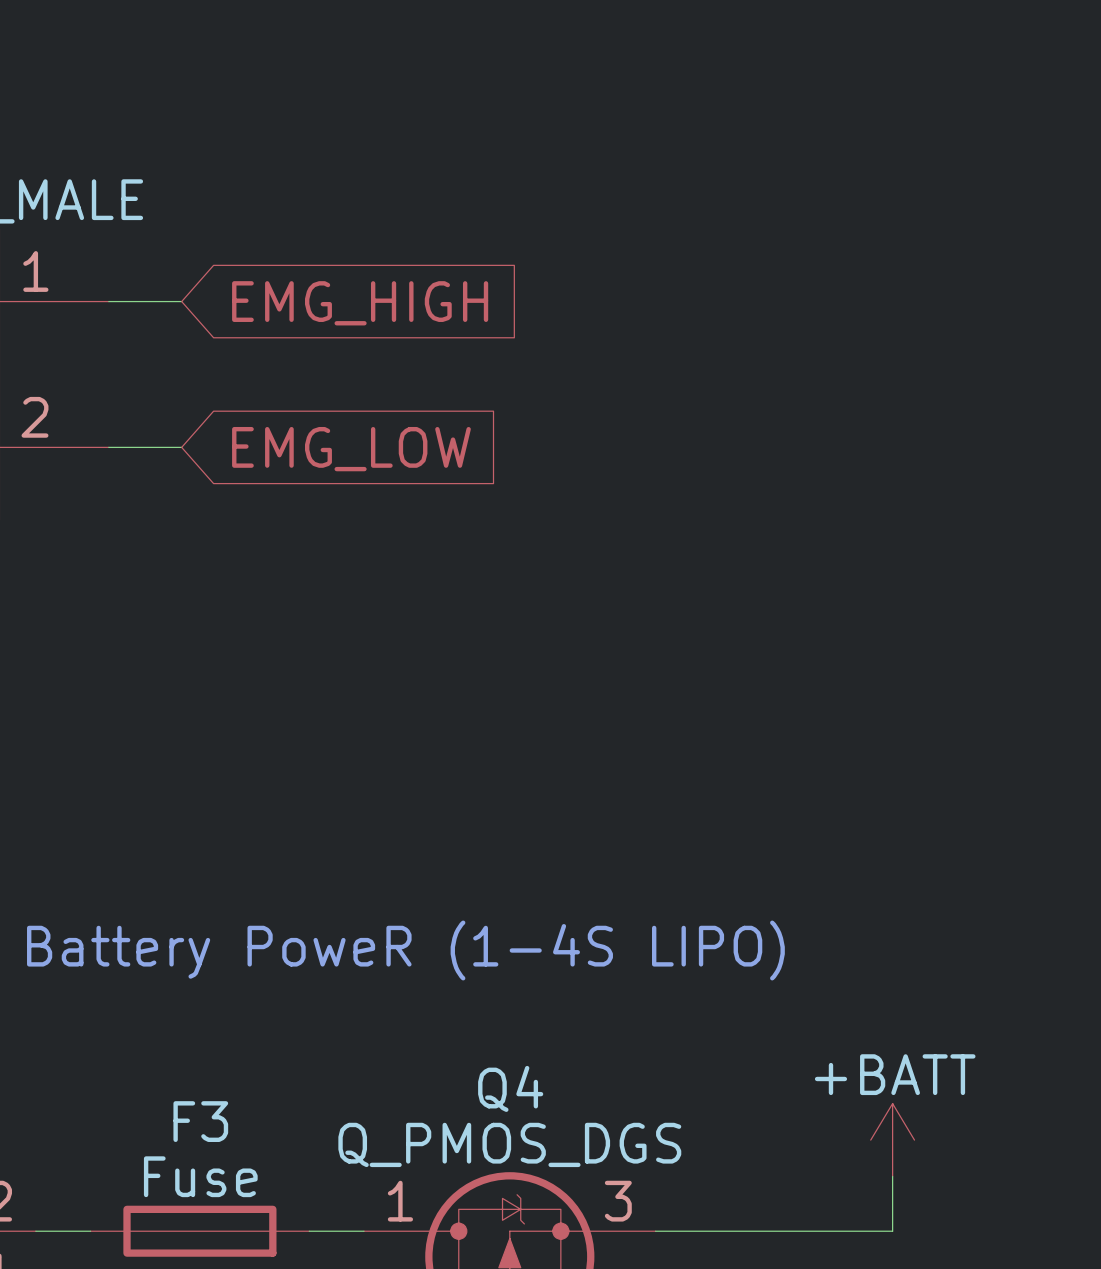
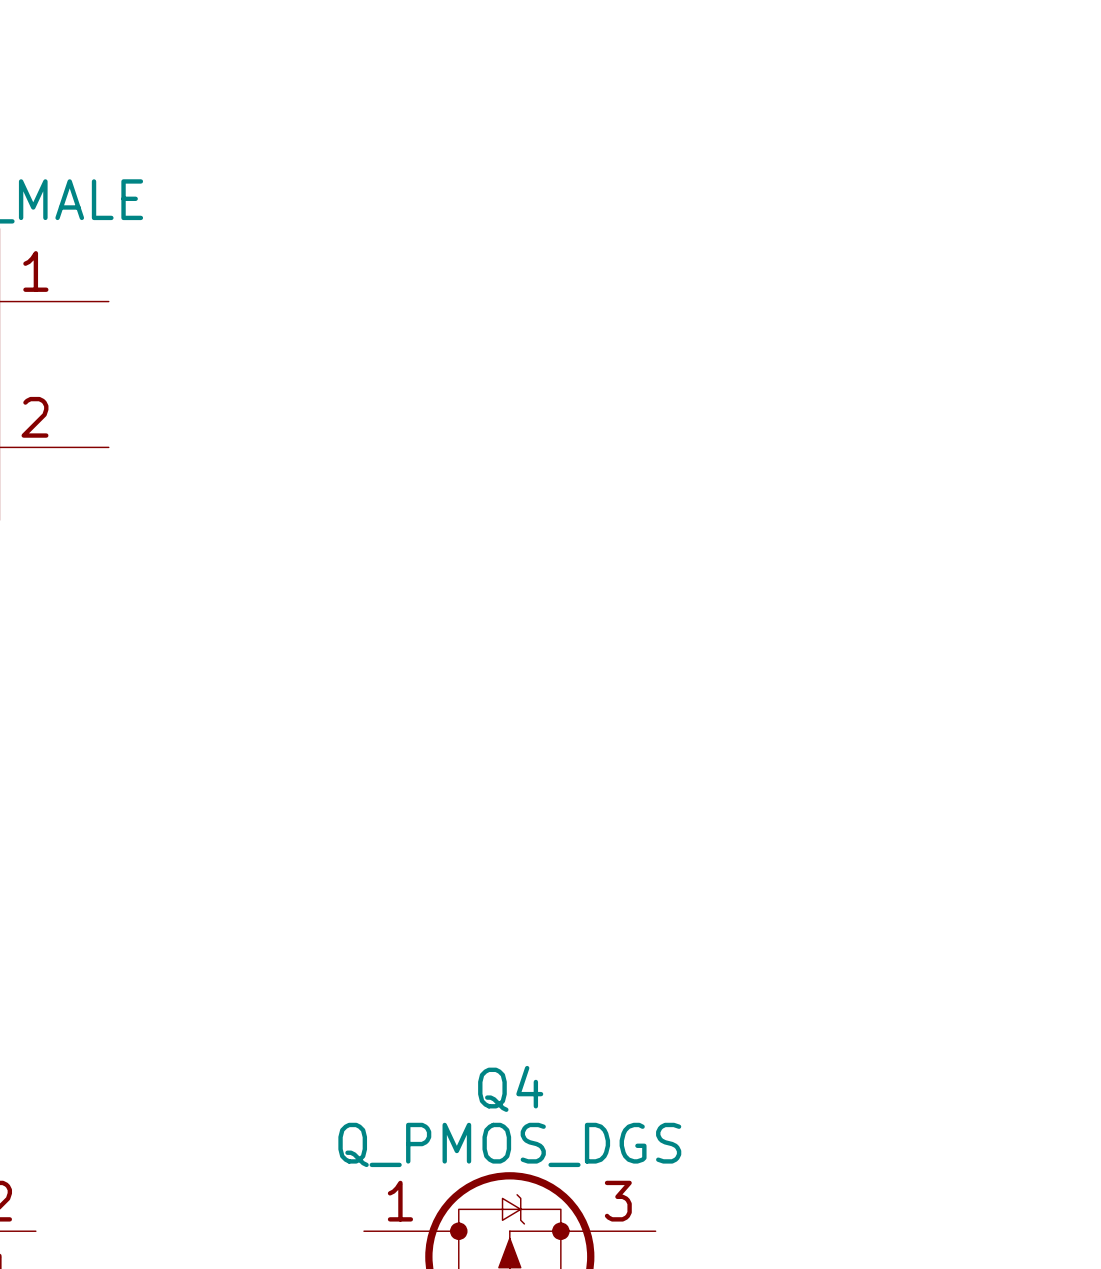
wire: (108, 301) (181, 301) -> none
global label: EMG_HIGH (360, 303) -> none
wire: (108, 447) (181, 447) -> none
global label: EMG_LOW (351, 449) -> none
text: Battery PoweR (1-4S LIPO) (405, 950) -> none
power symbol: +BATT (892, 1140) -> none
wire: (892, 1176) (892, 1231) (655, 1231) -> none
wire: (35, 1231) (90, 1231) -> none
F3: Fuse (199, 1231) -> none
wire: (309, 1231) (363, 1231) -> none

